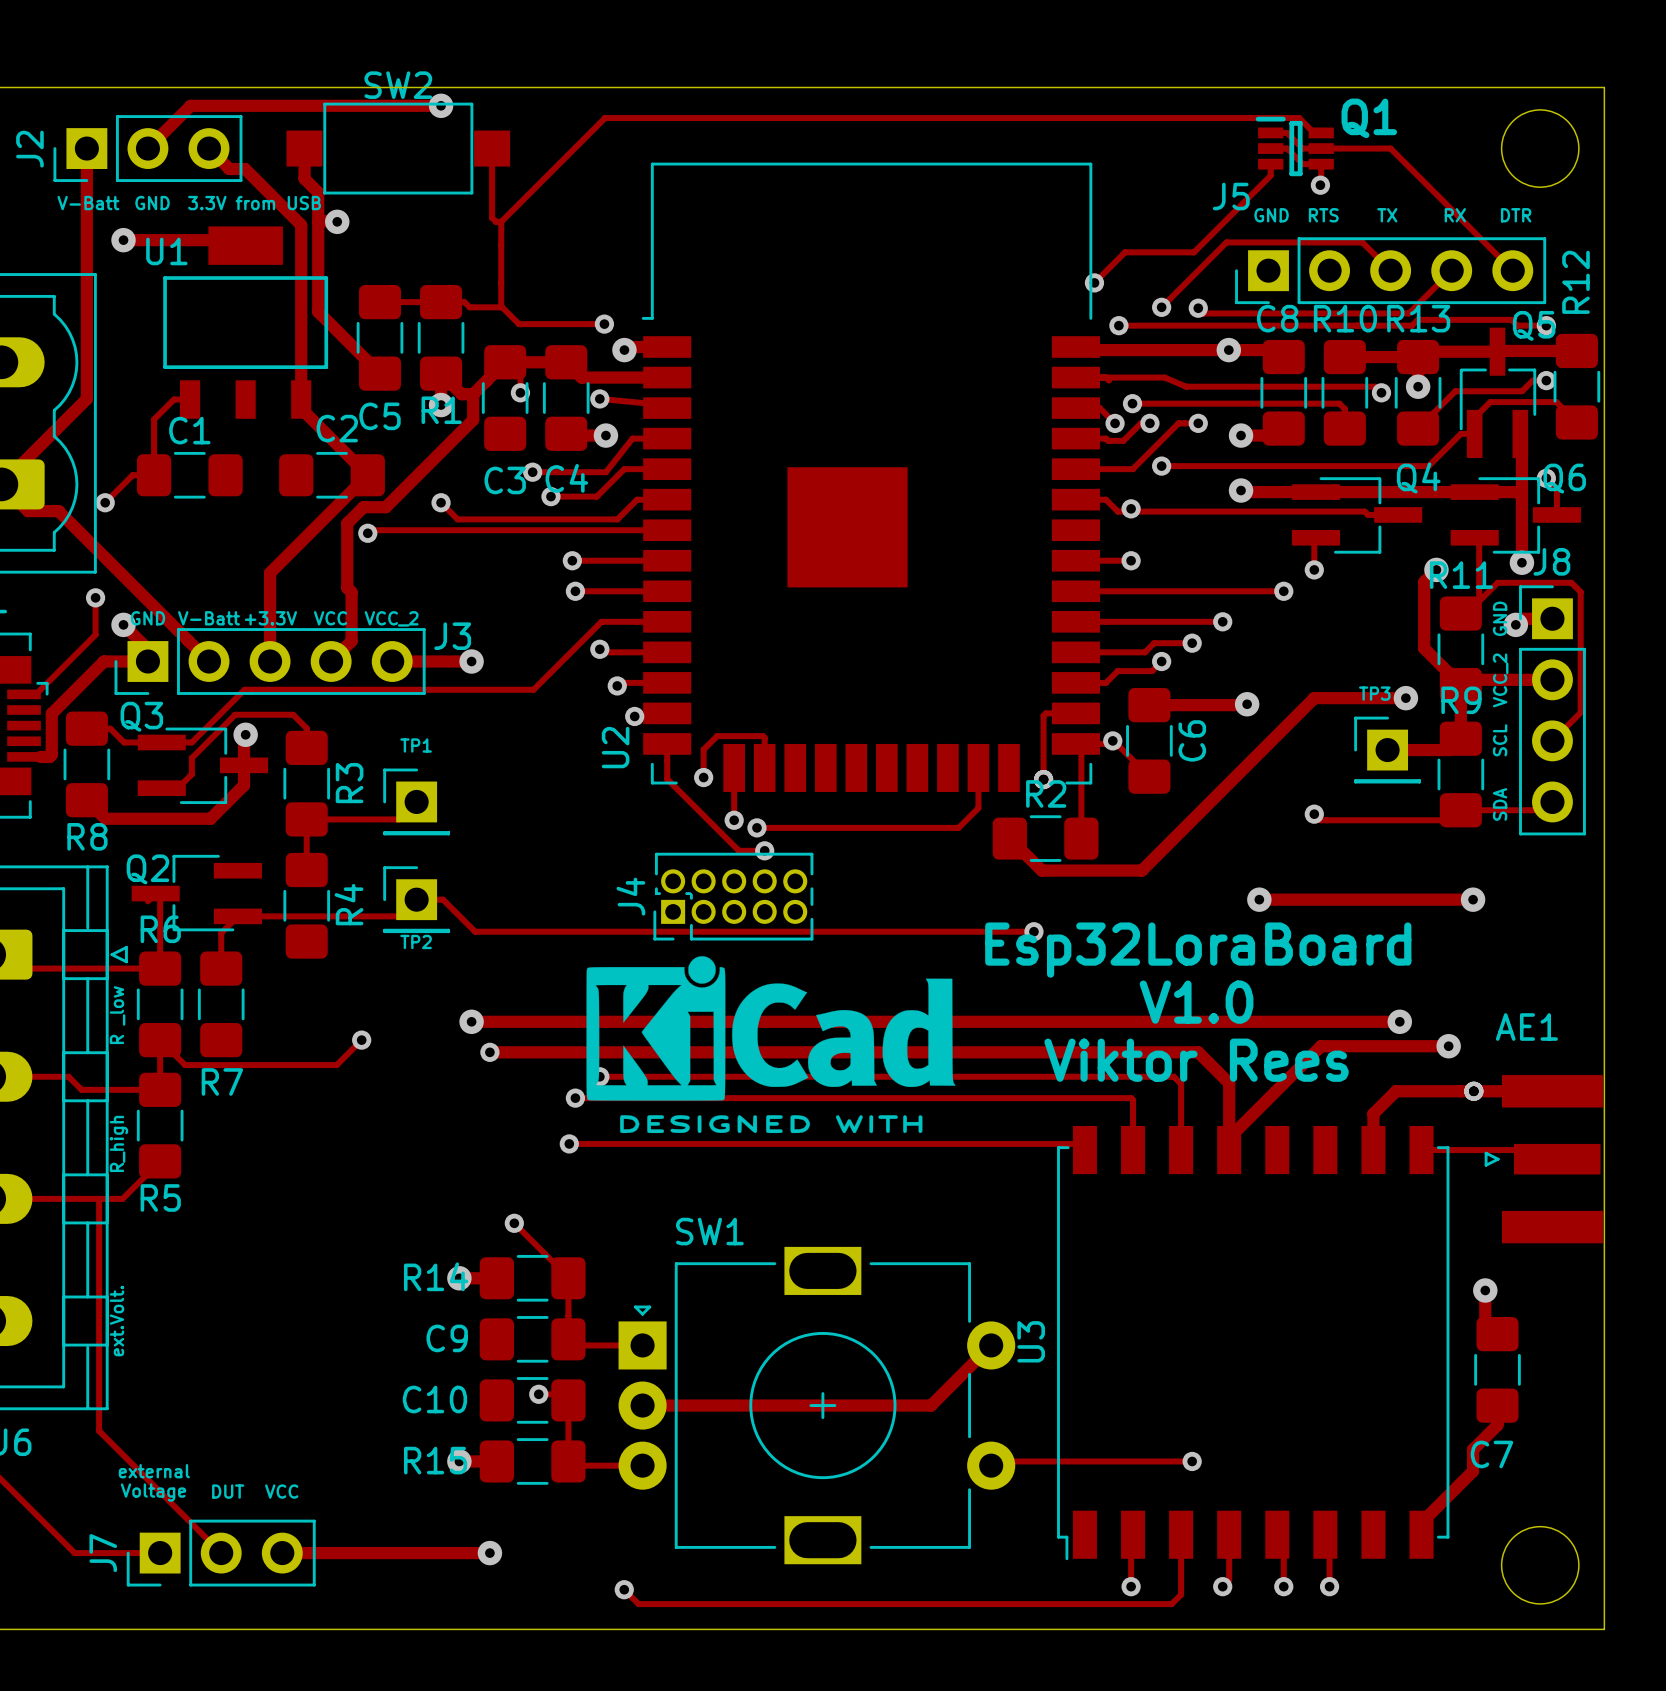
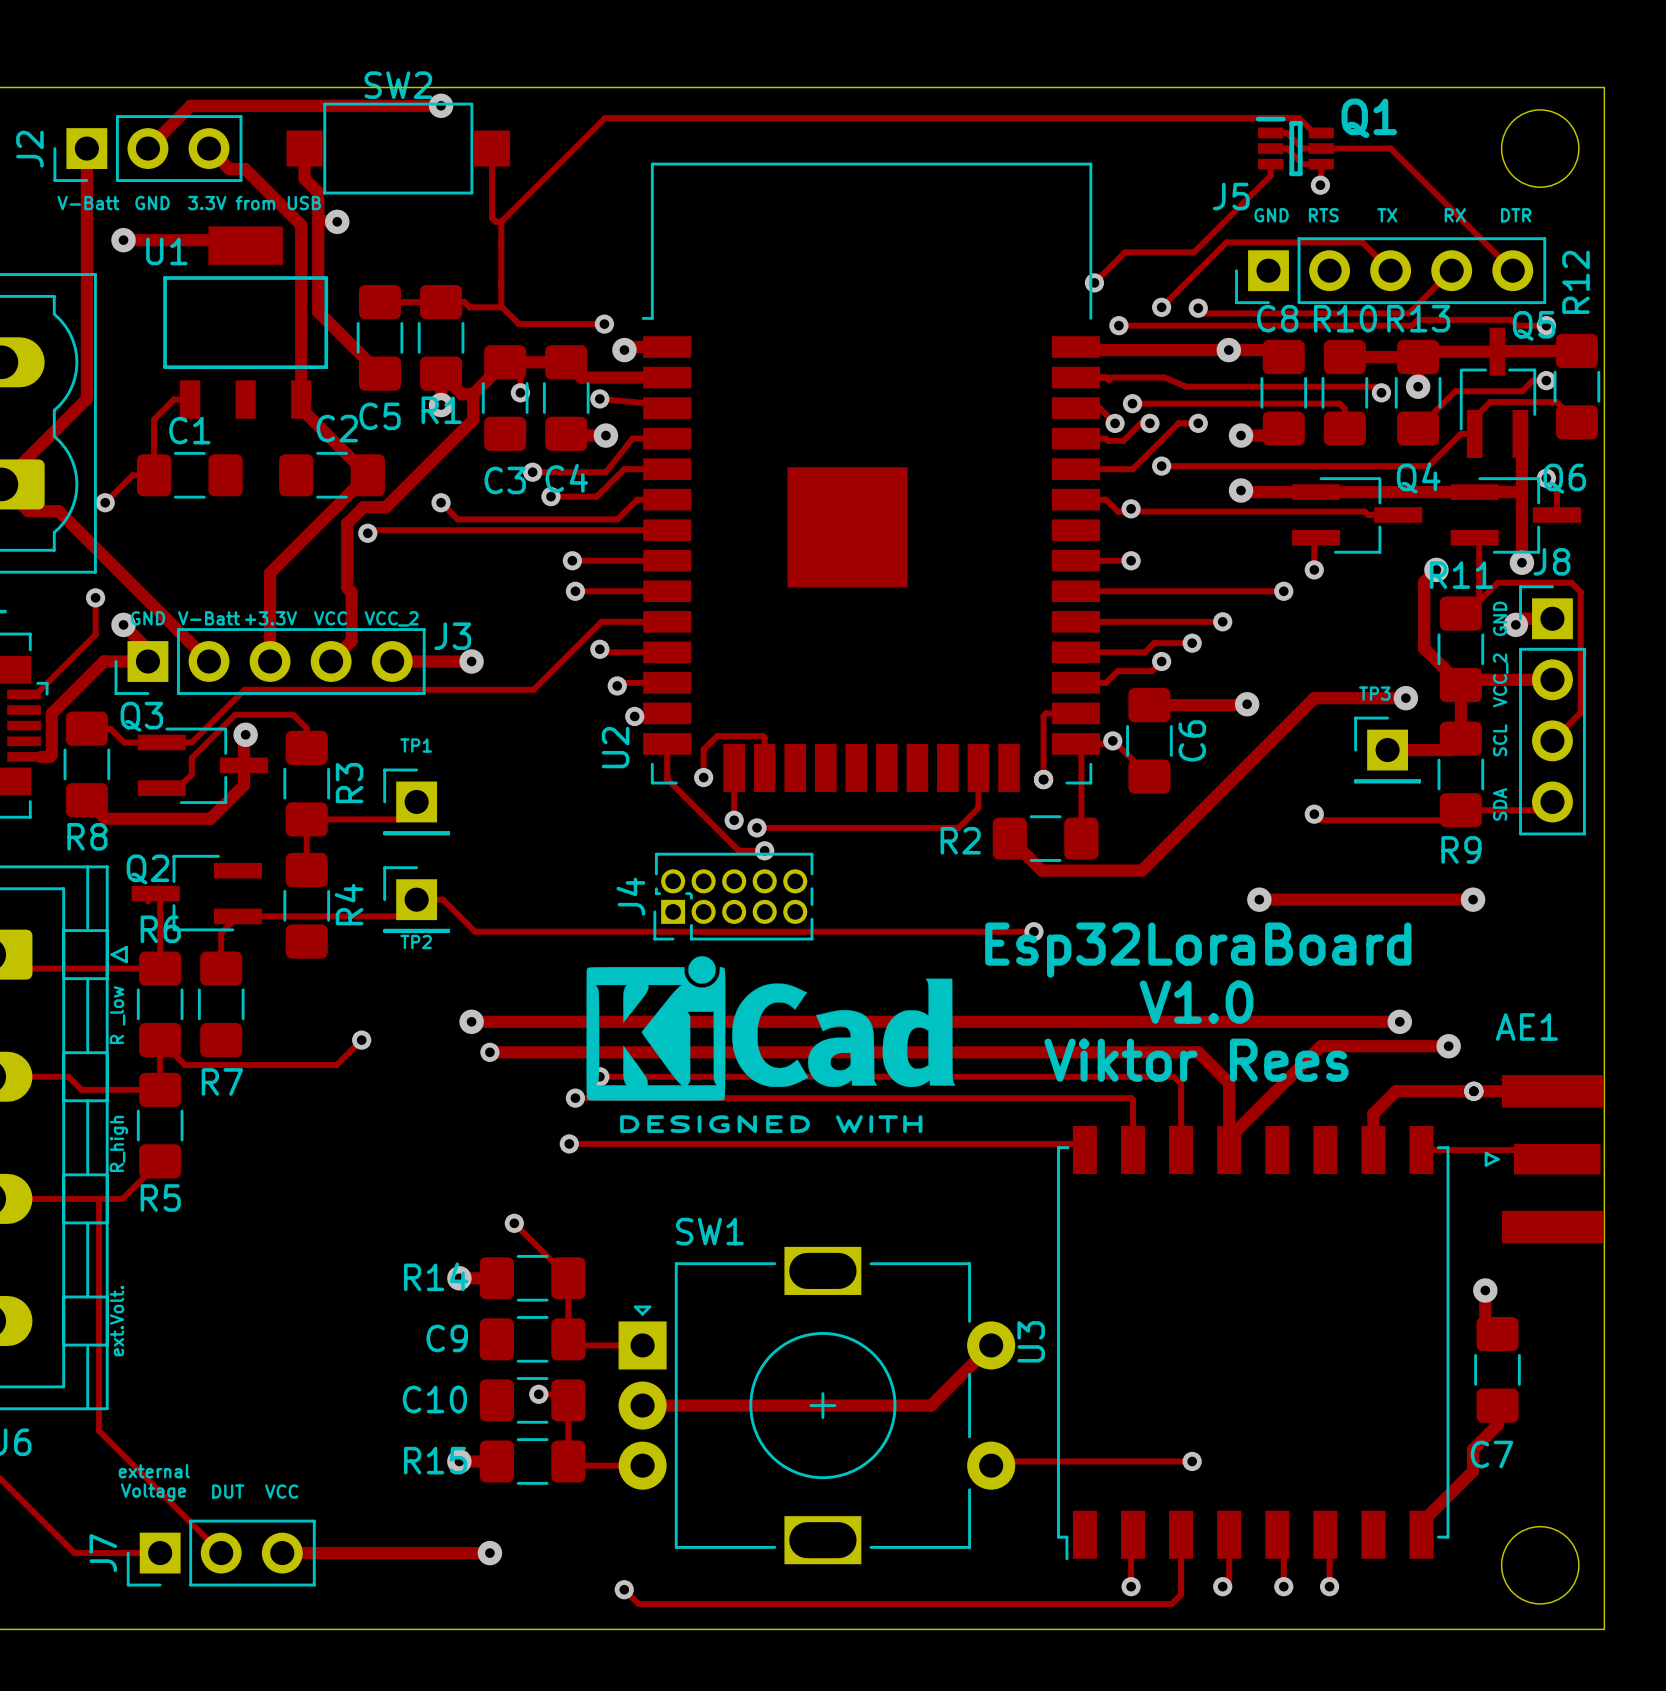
R9 name position: R9 (1461, 700) -> R9 (1461, 849)
R2 name position: R2 (1046, 793) -> R2 (960, 840)

